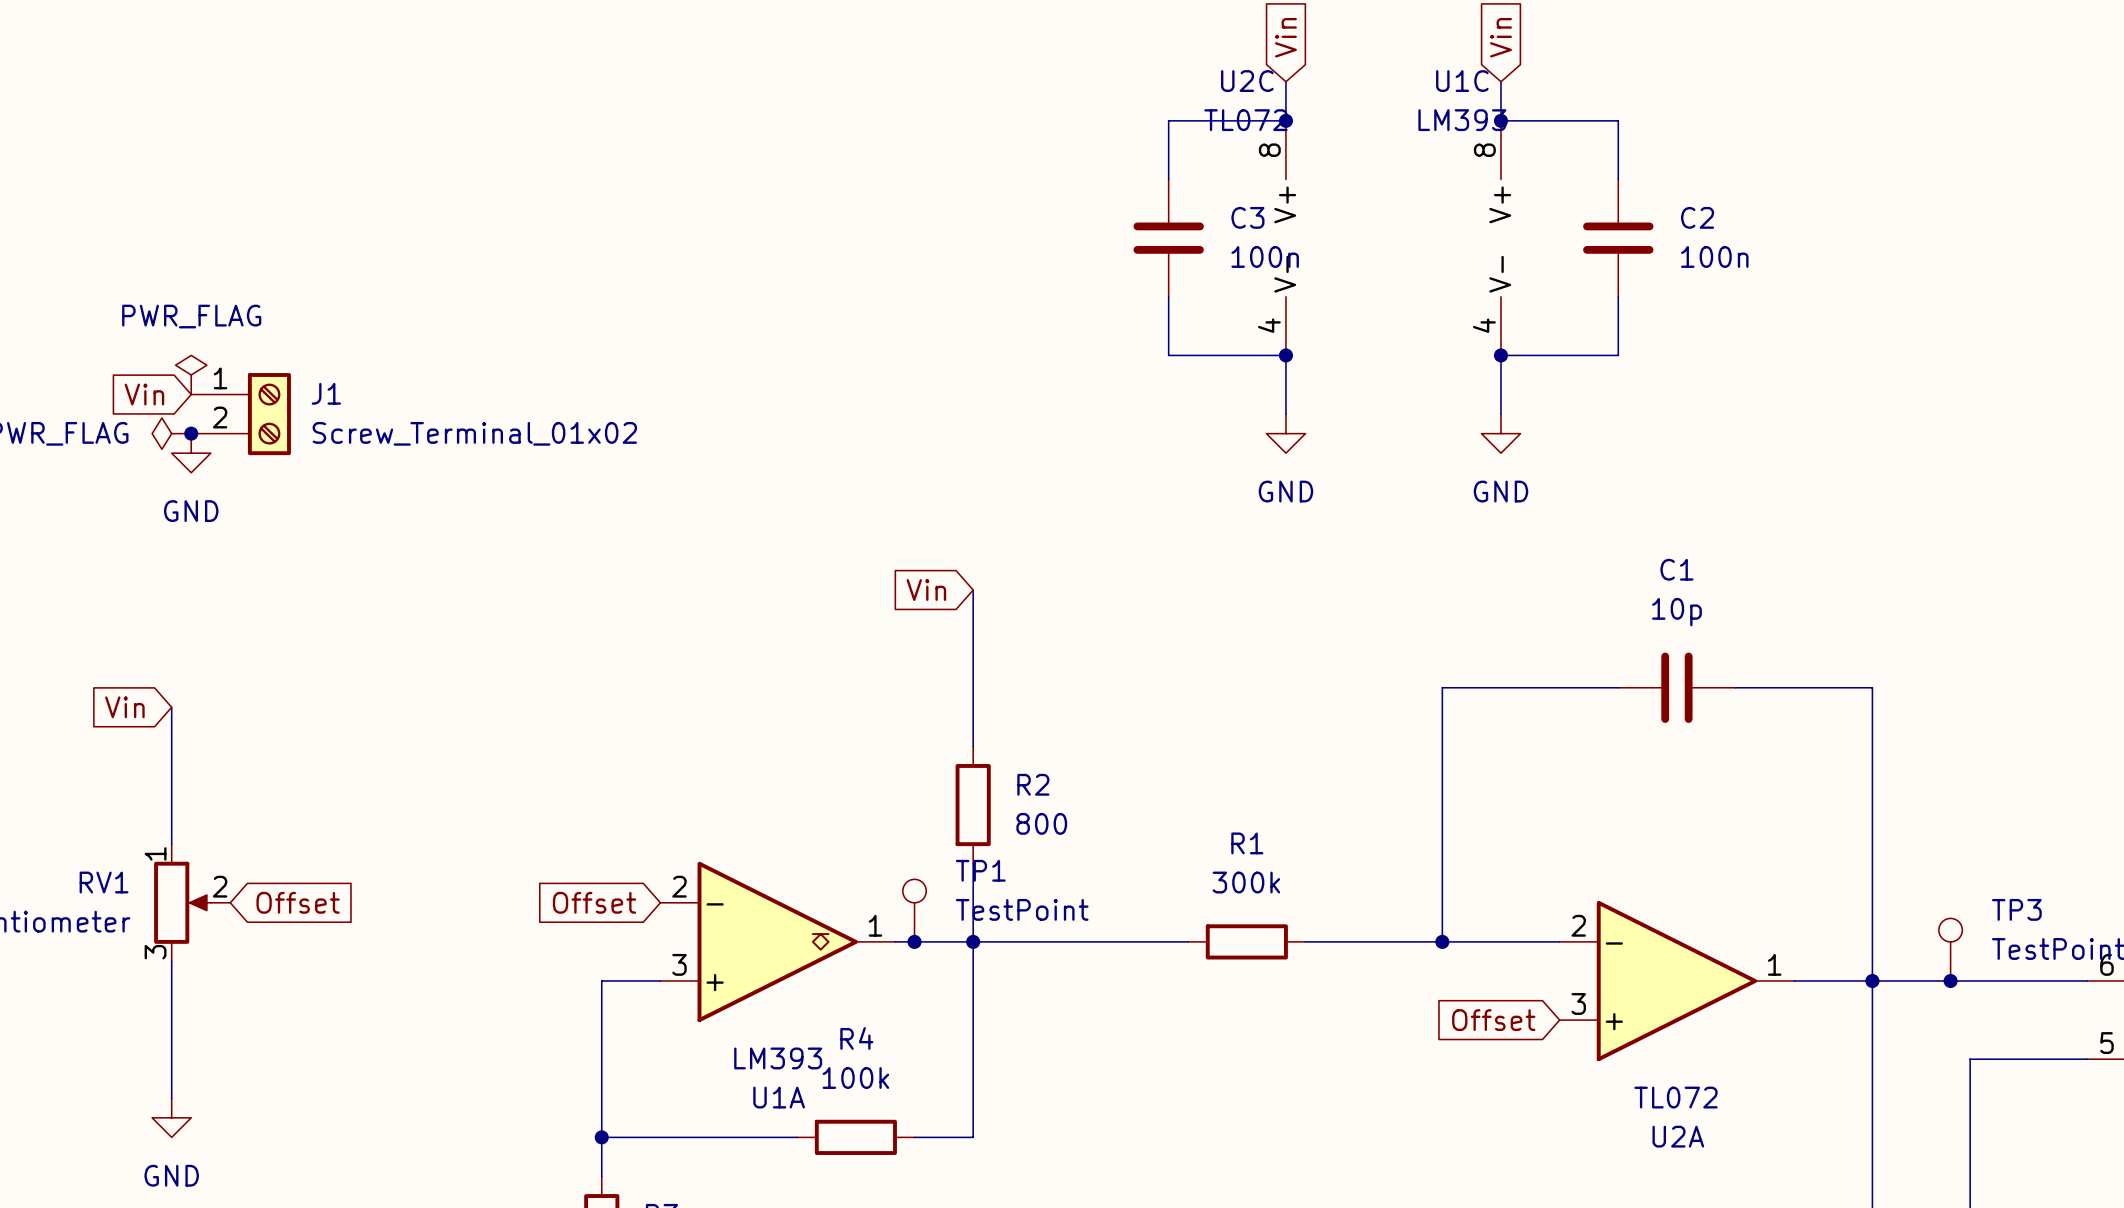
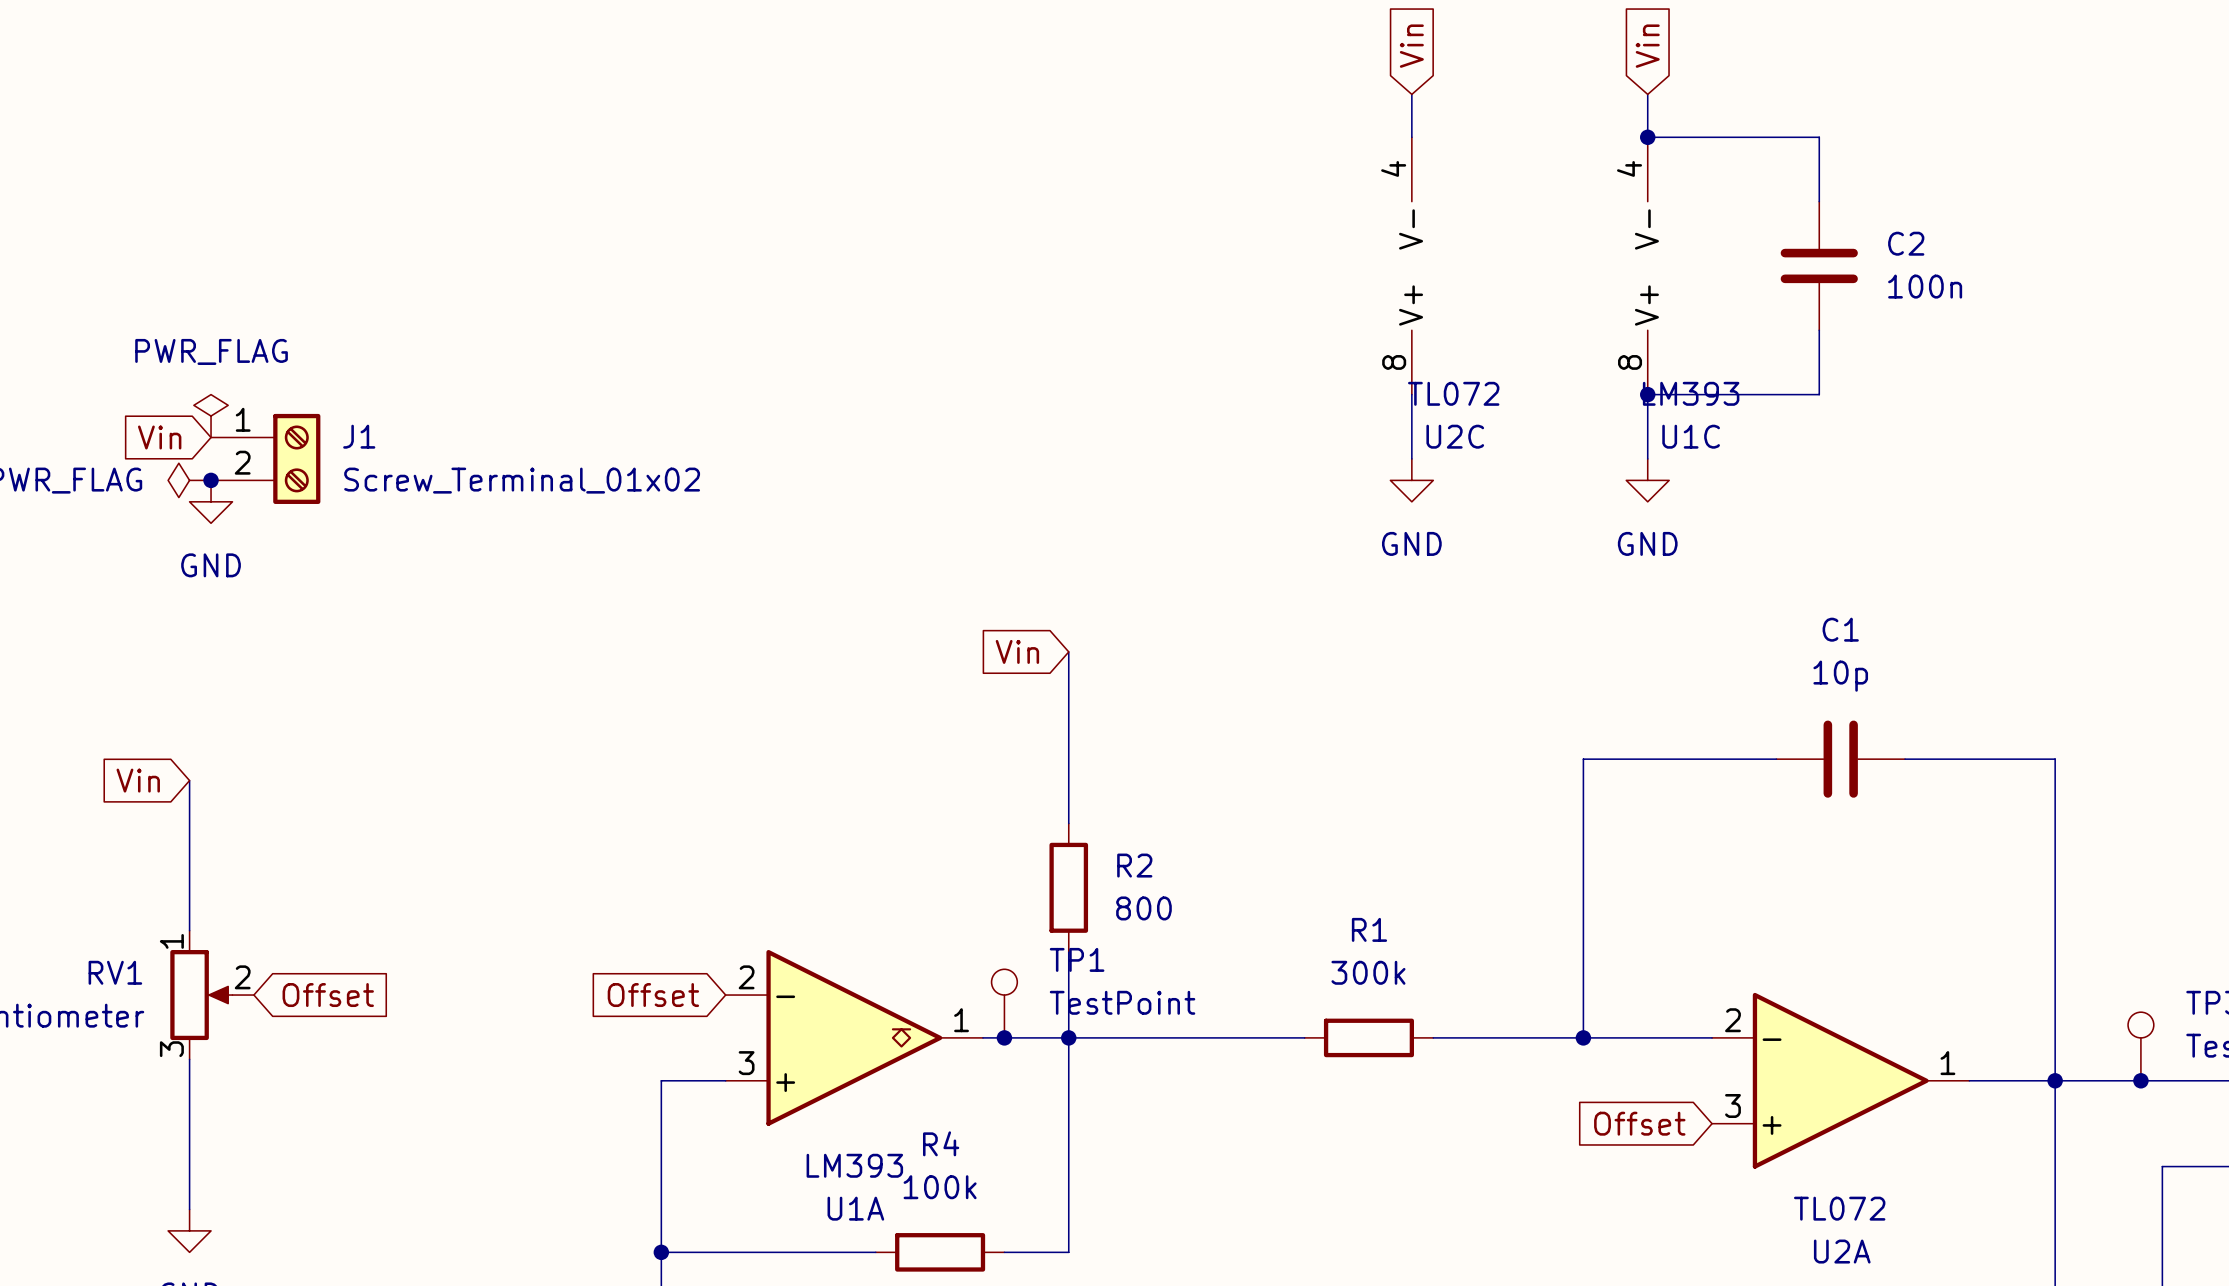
wire: (1285, 120) (1168, 120) (1168, 179) -> none
junction: (1285, 120) -> none
wire: (1618, 120) (1618, 179) -> (1776, 137) (1819, 137) (1819, 201)
C3: 100n (1168, 238) -> none
U2C rotation: 0° (1285, 238) -> 180° (1411, 265)
U1C rotation: 0° (1500, 238) -> 180° (1647, 265)
C2 position: (1618, 238) -> (1819, 265)
wire: (1168, 296) (1168, 355) (1285, 355) -> none
wire: (1618, 296) (1618, 355) -> (1819, 330) (1819, 394) (1776, 394)
junction: (1285, 355) -> none

